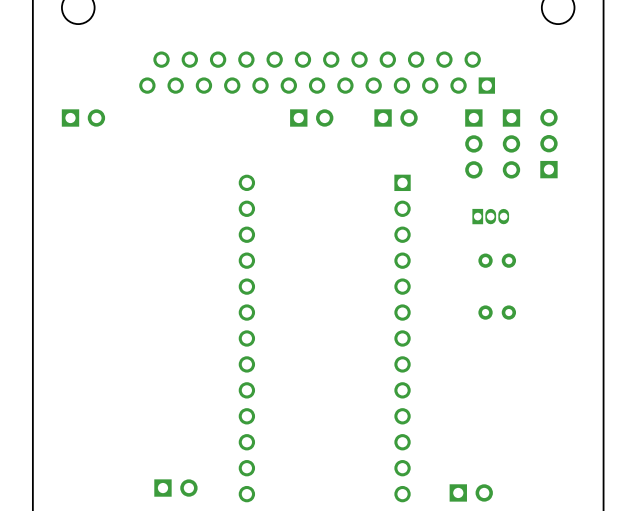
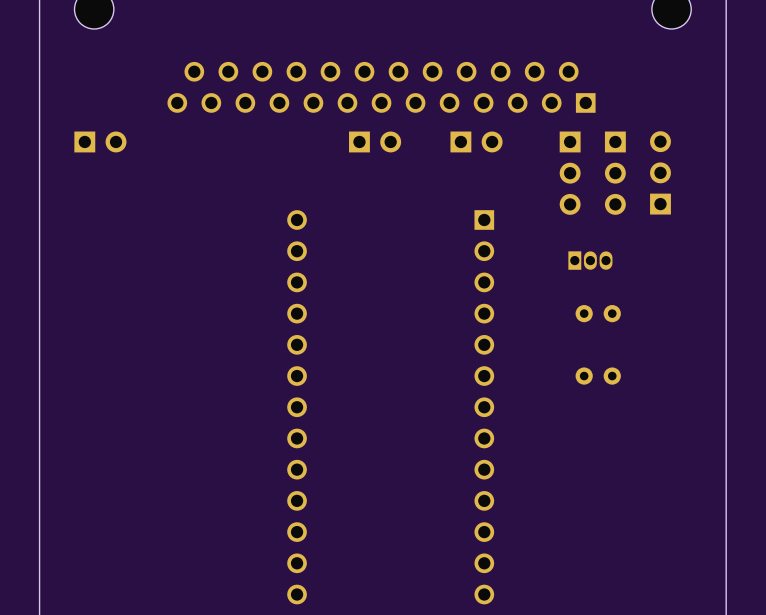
part: (175, 488) -> none
part: (471, 492) -> none

